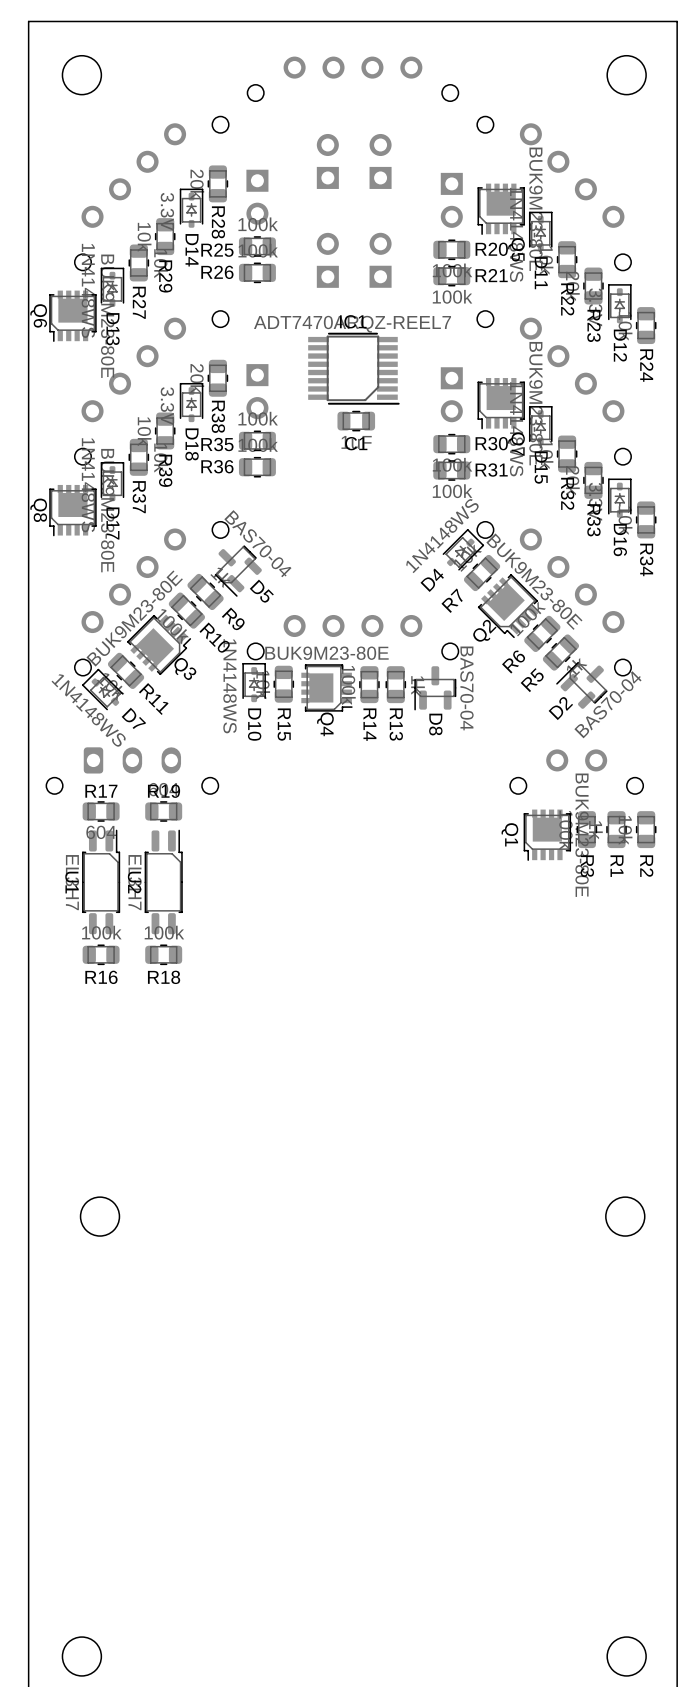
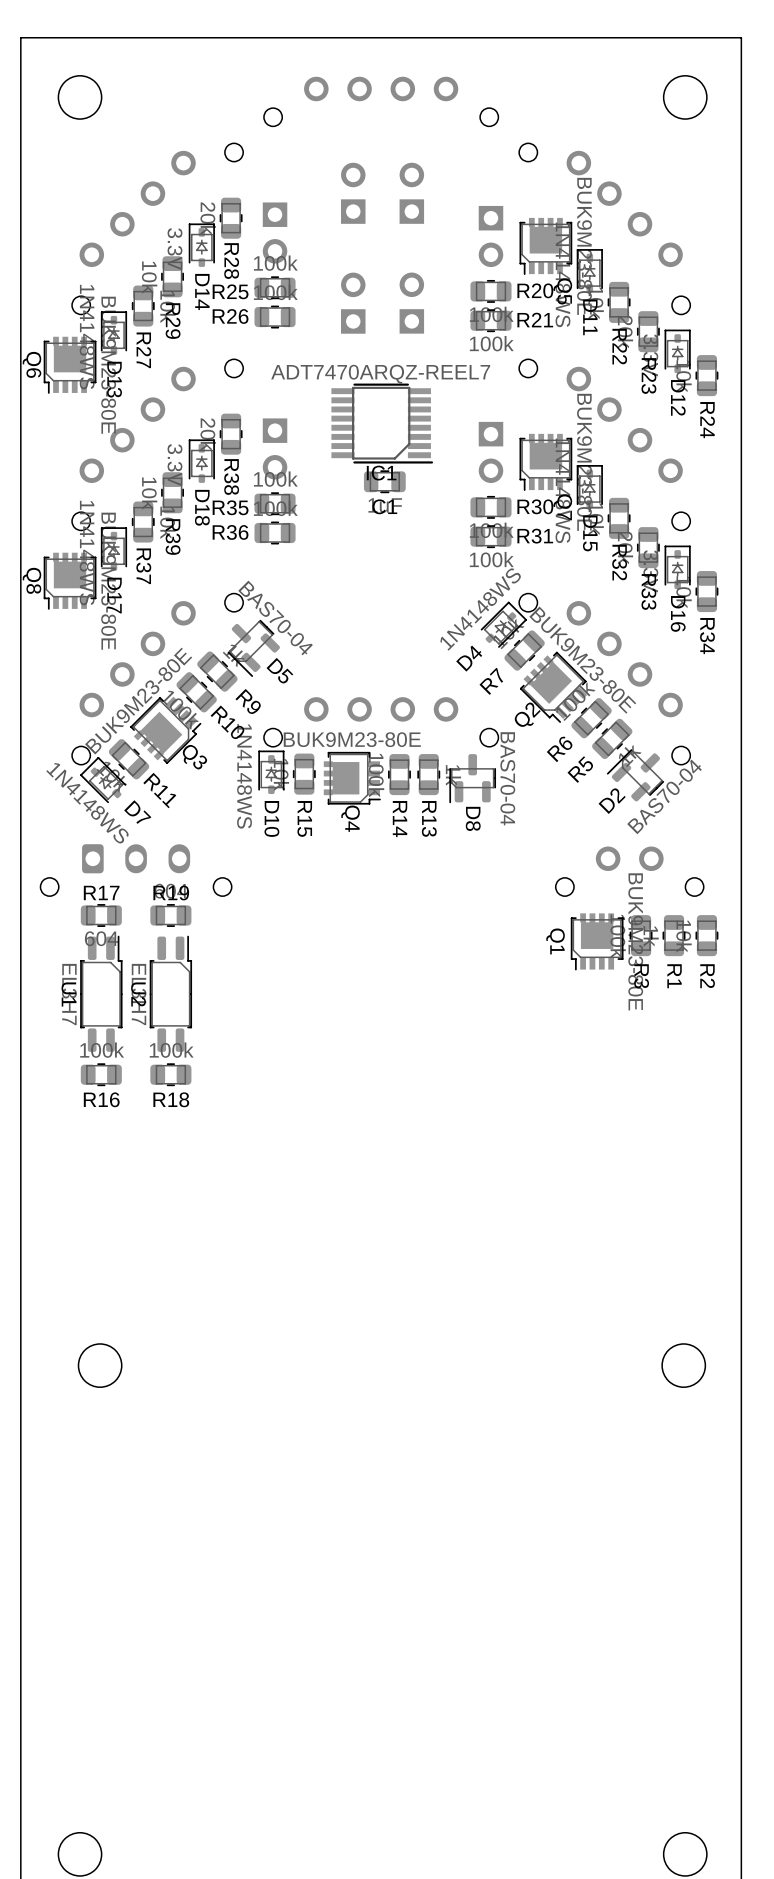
IC1 name position: IC1 (353, 321) -> IC1 (381, 473)

